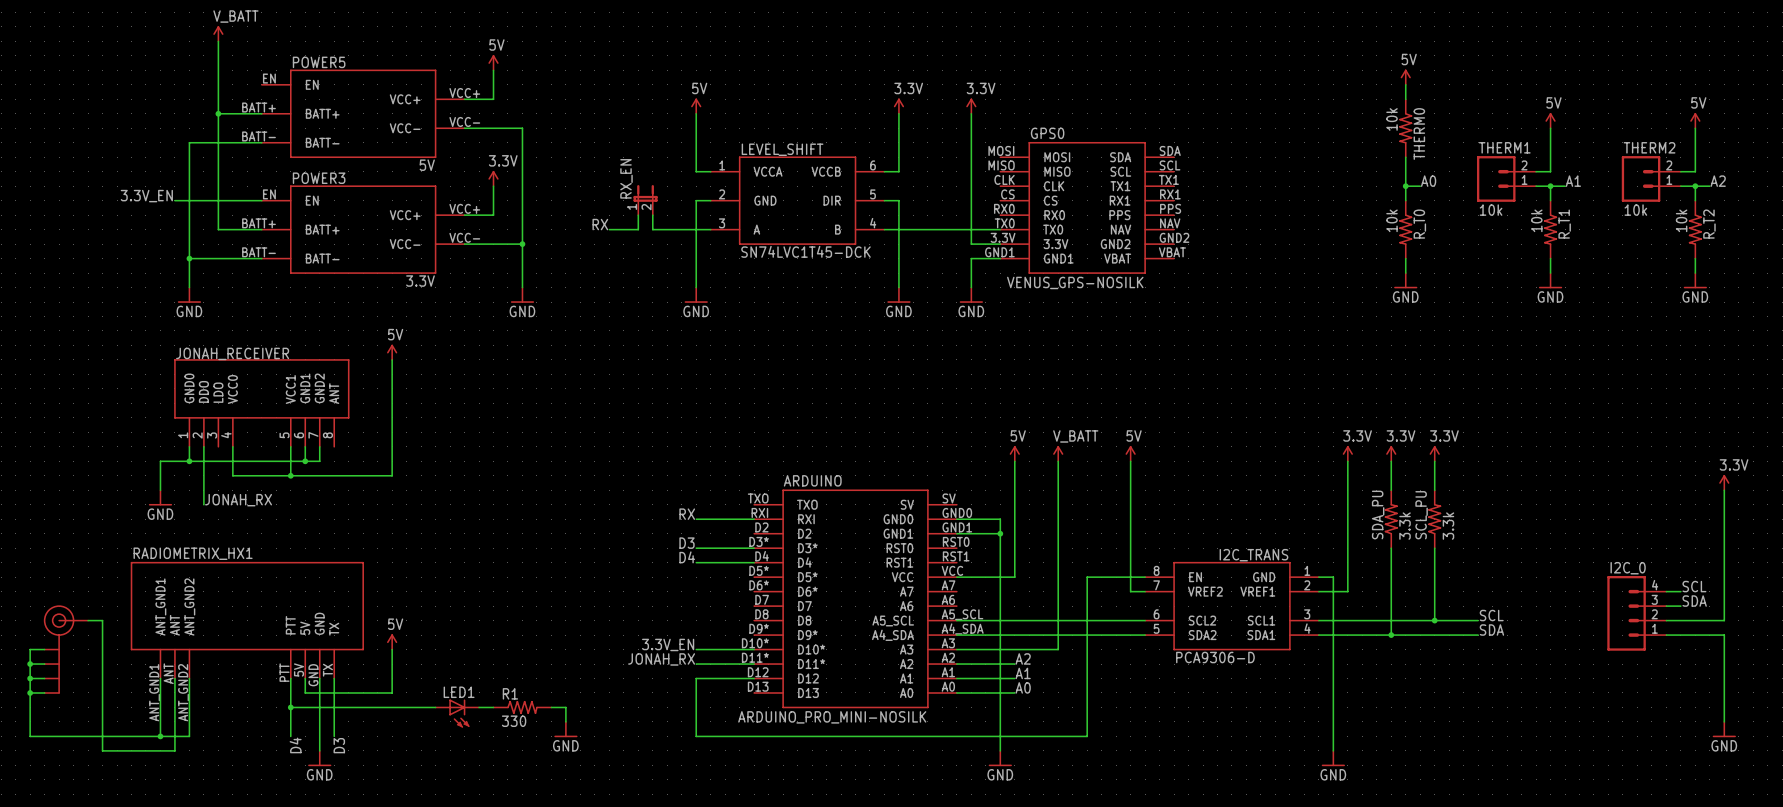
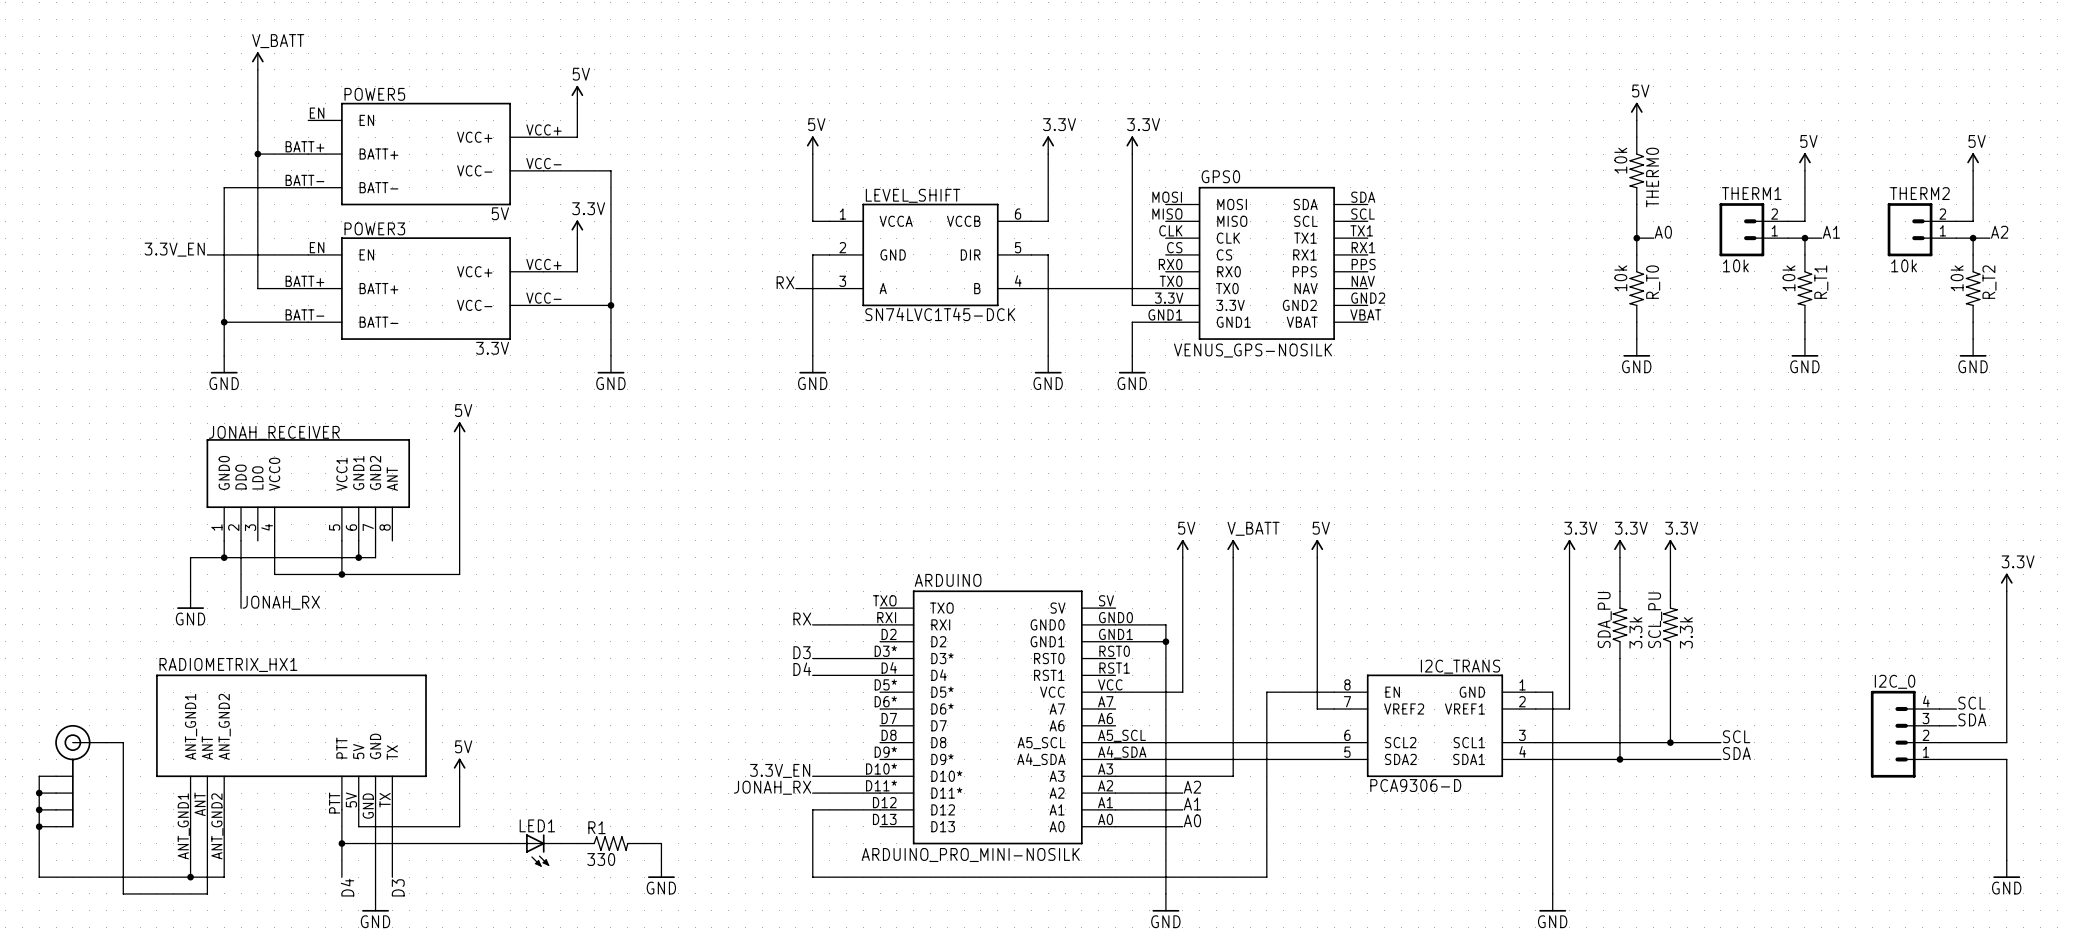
RX_EN: (645, 200) -> none
wire: (638, 215) (638, 229) (609, 229) -> none
wire: (652, 215) (652, 229) (681, 229) -> none
label position: RX (600, 224) -> RX (785, 282)

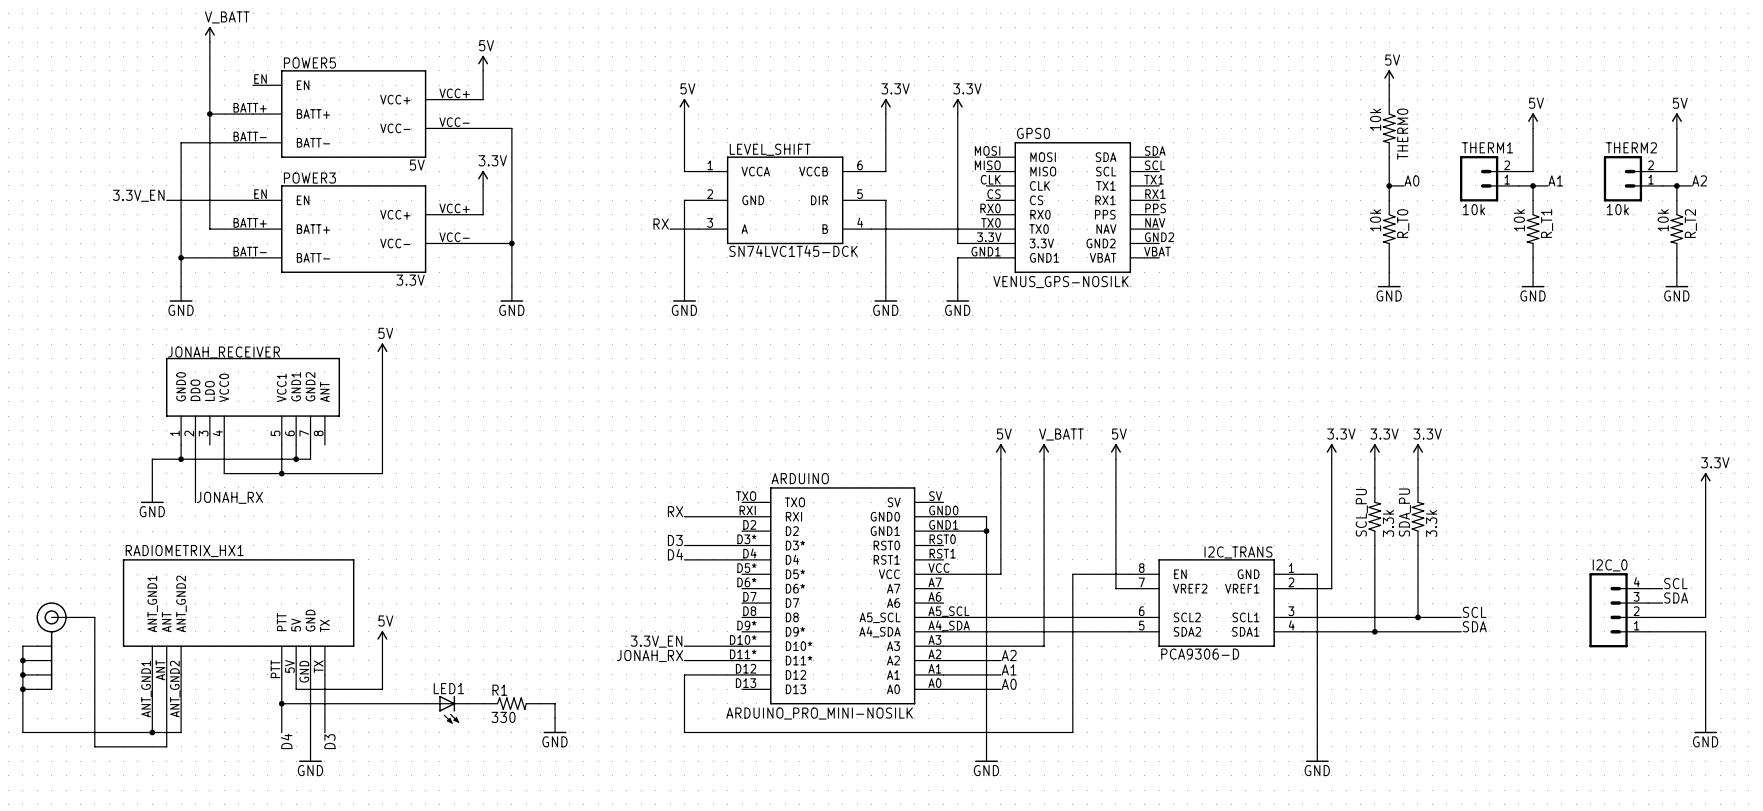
SDA_PU name: SDA_PU (1604, 620) -> SCL_PU (1361, 512)
SCL_PU name: SCL_PU (1655, 620) -> SDA_PU (1404, 512)

